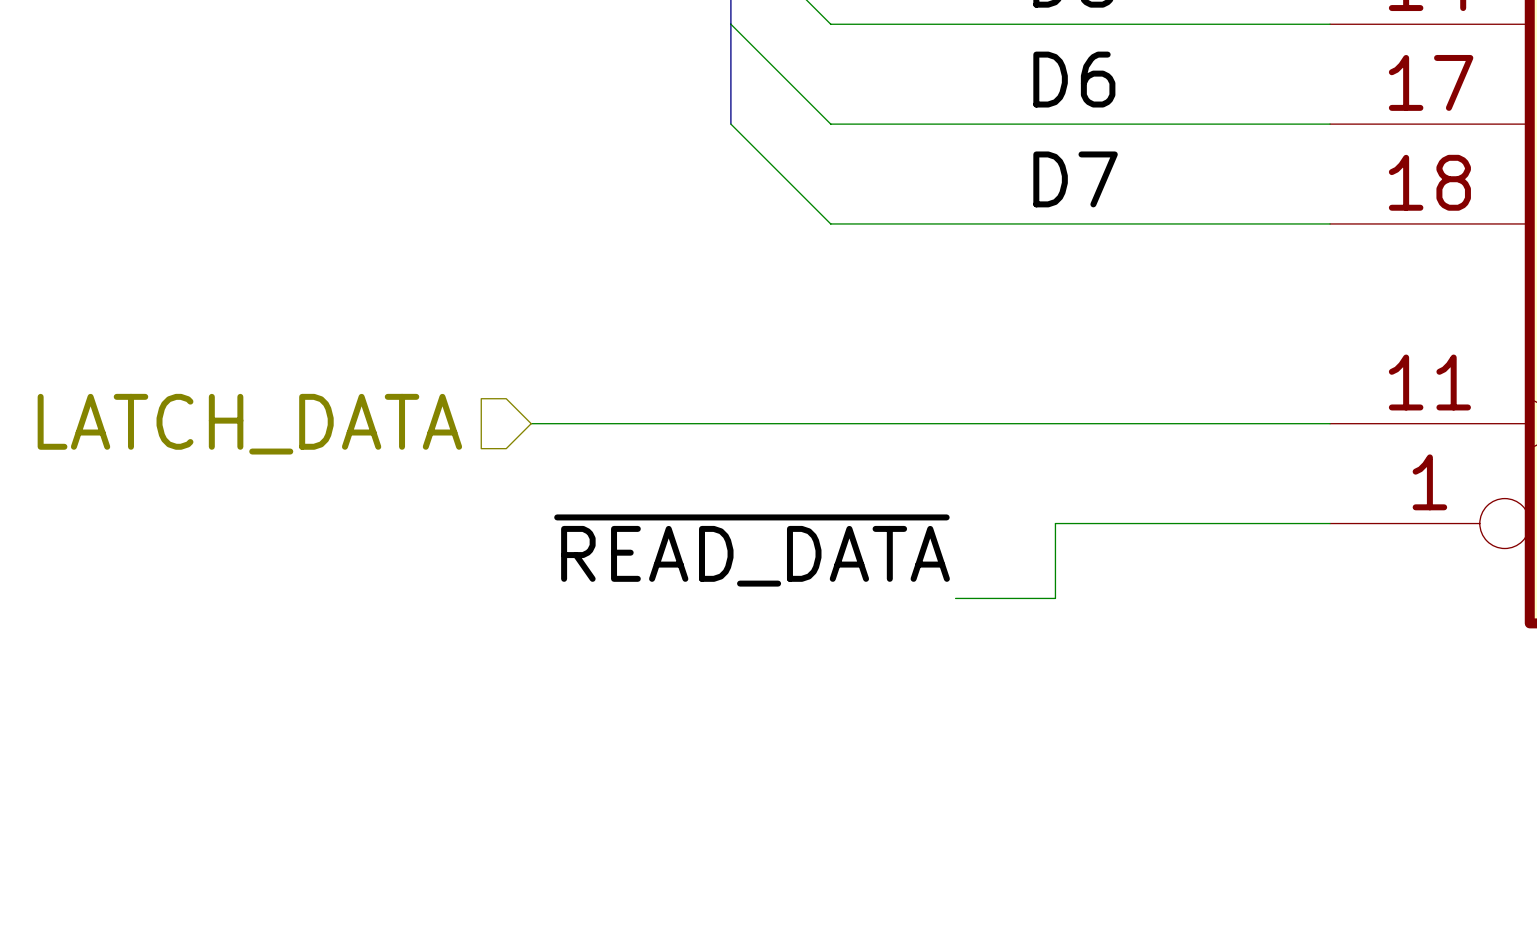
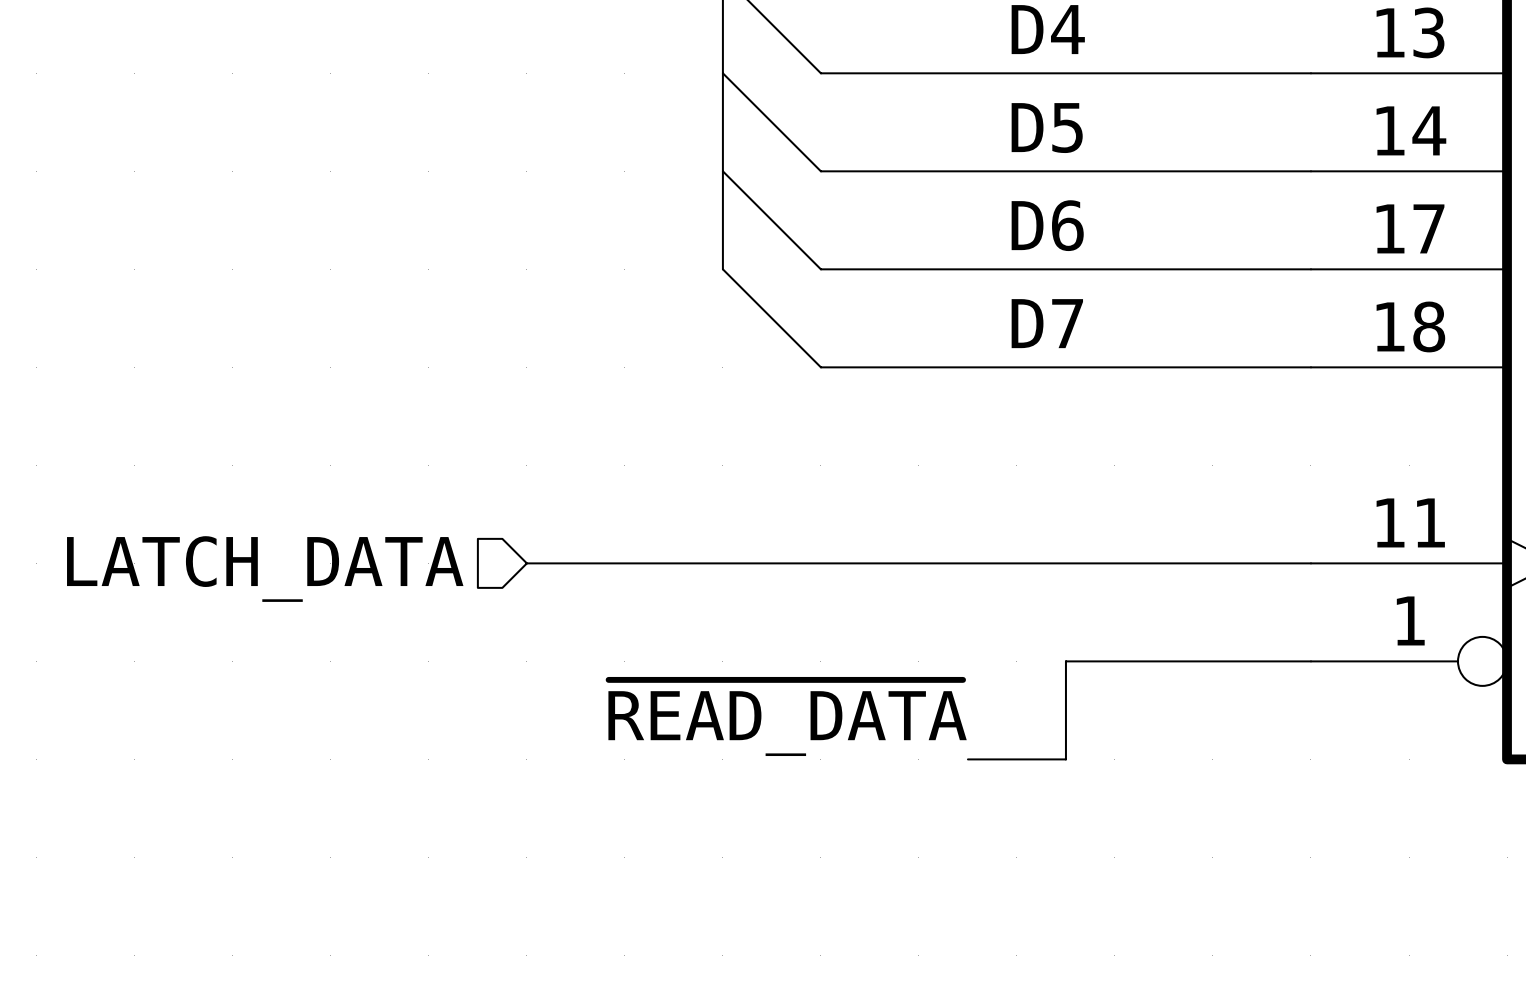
wire: (1080, 523) (1055, 523) (1055, 598) (955, 598) -> (1065, 661) (1065, 759) (967, 759)
label position: ~{READ_DATA} (752, 550) -> ~{READ_DATA} (787, 717)

